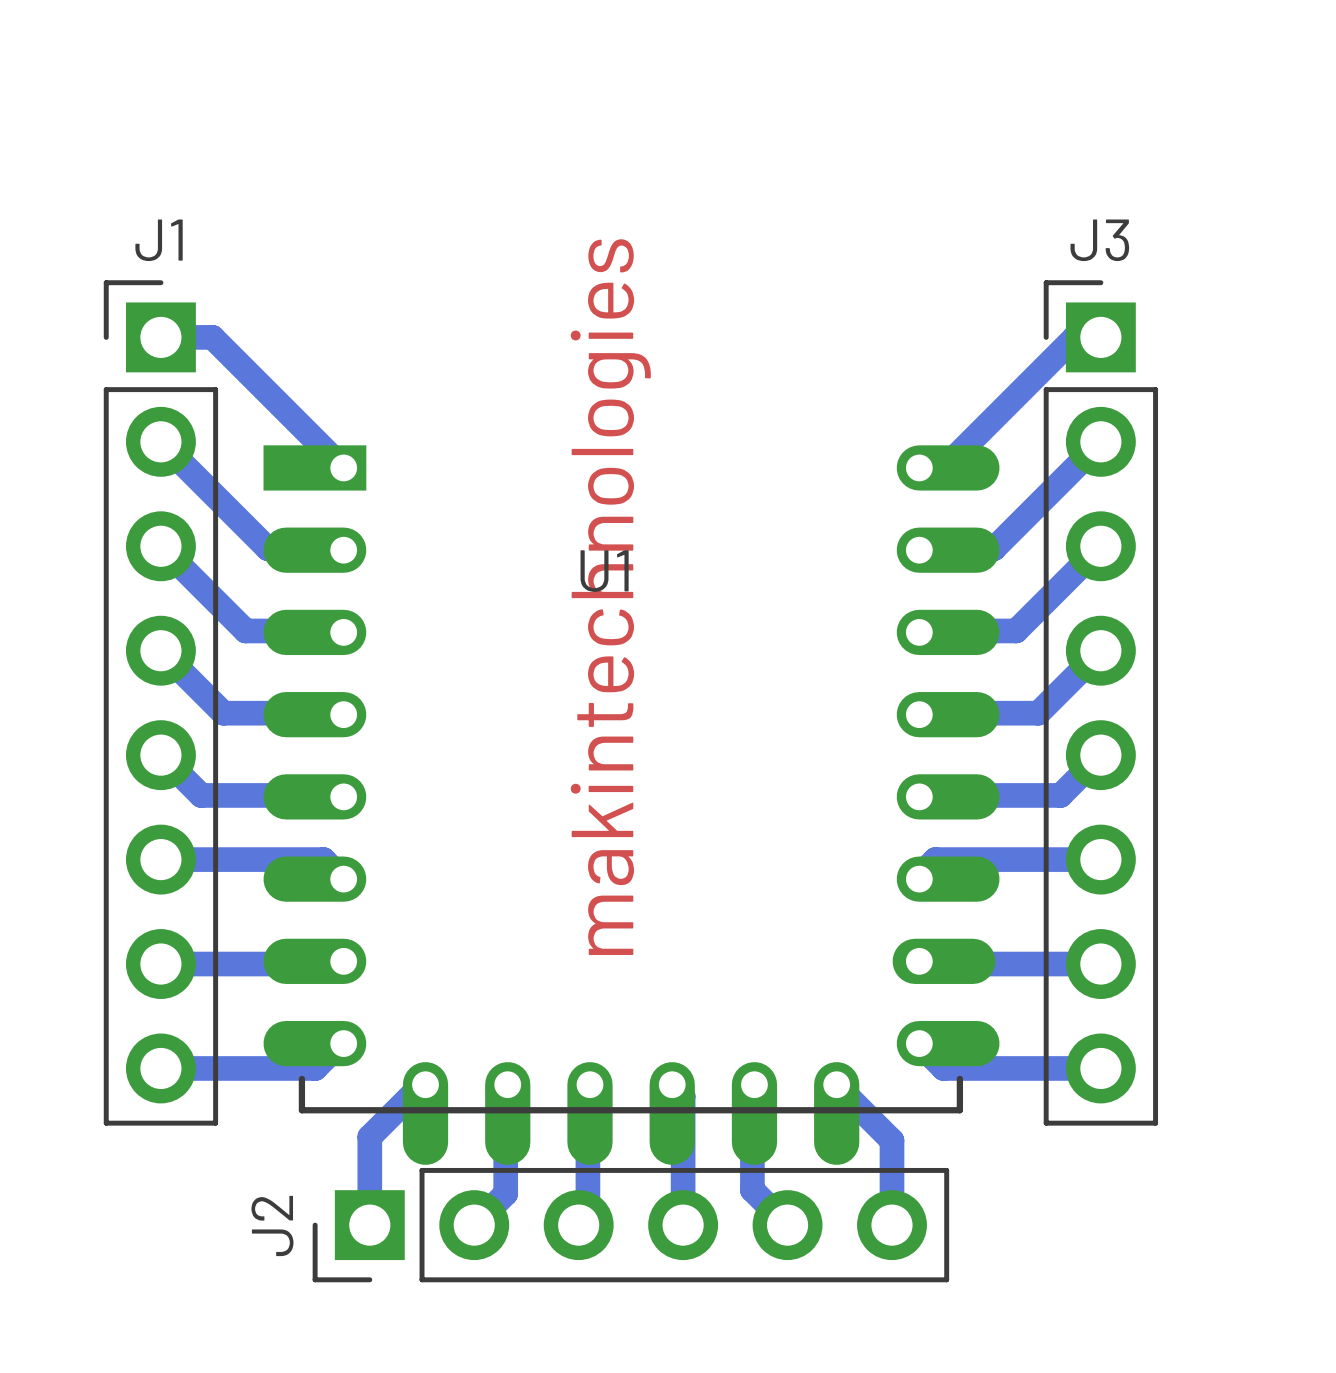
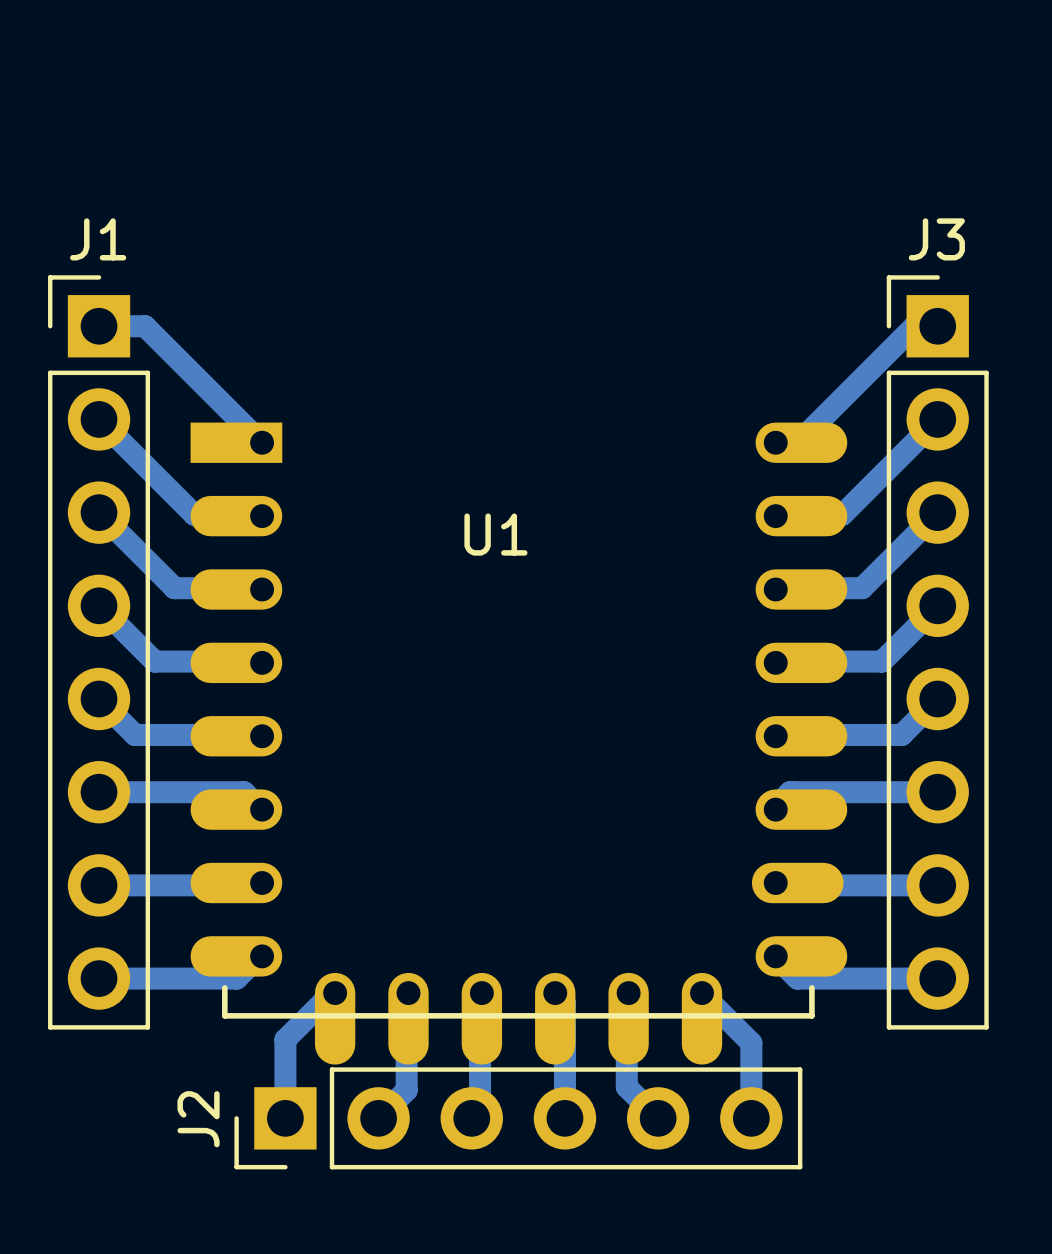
text: makintechnologies (610, 597) -> none

